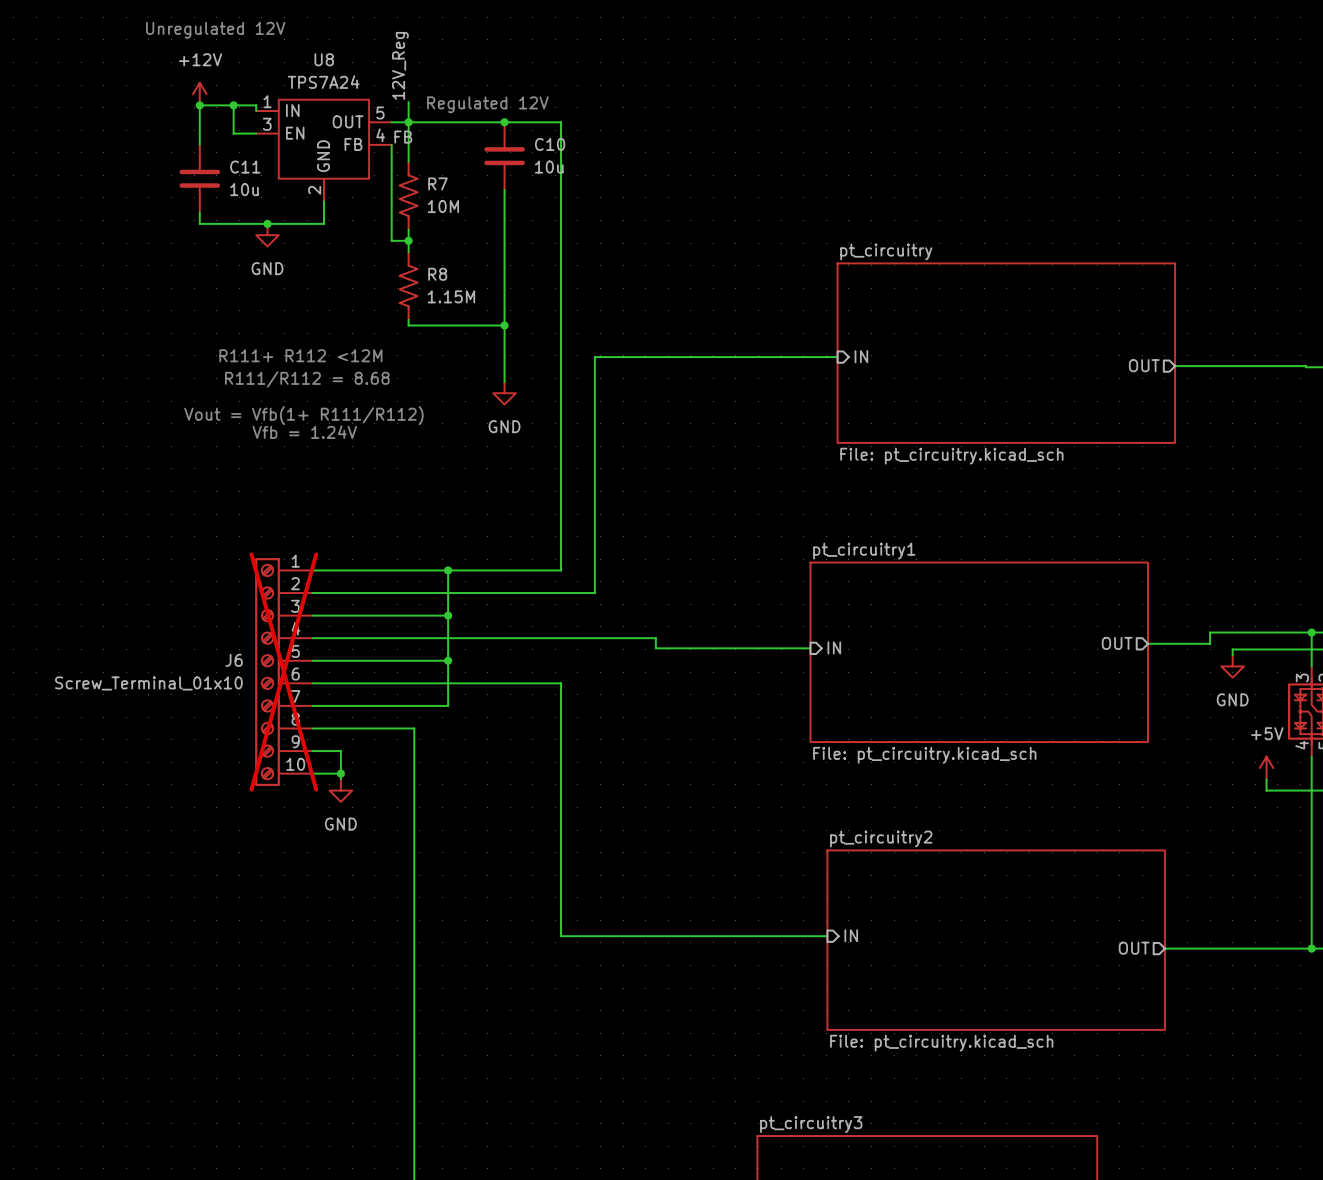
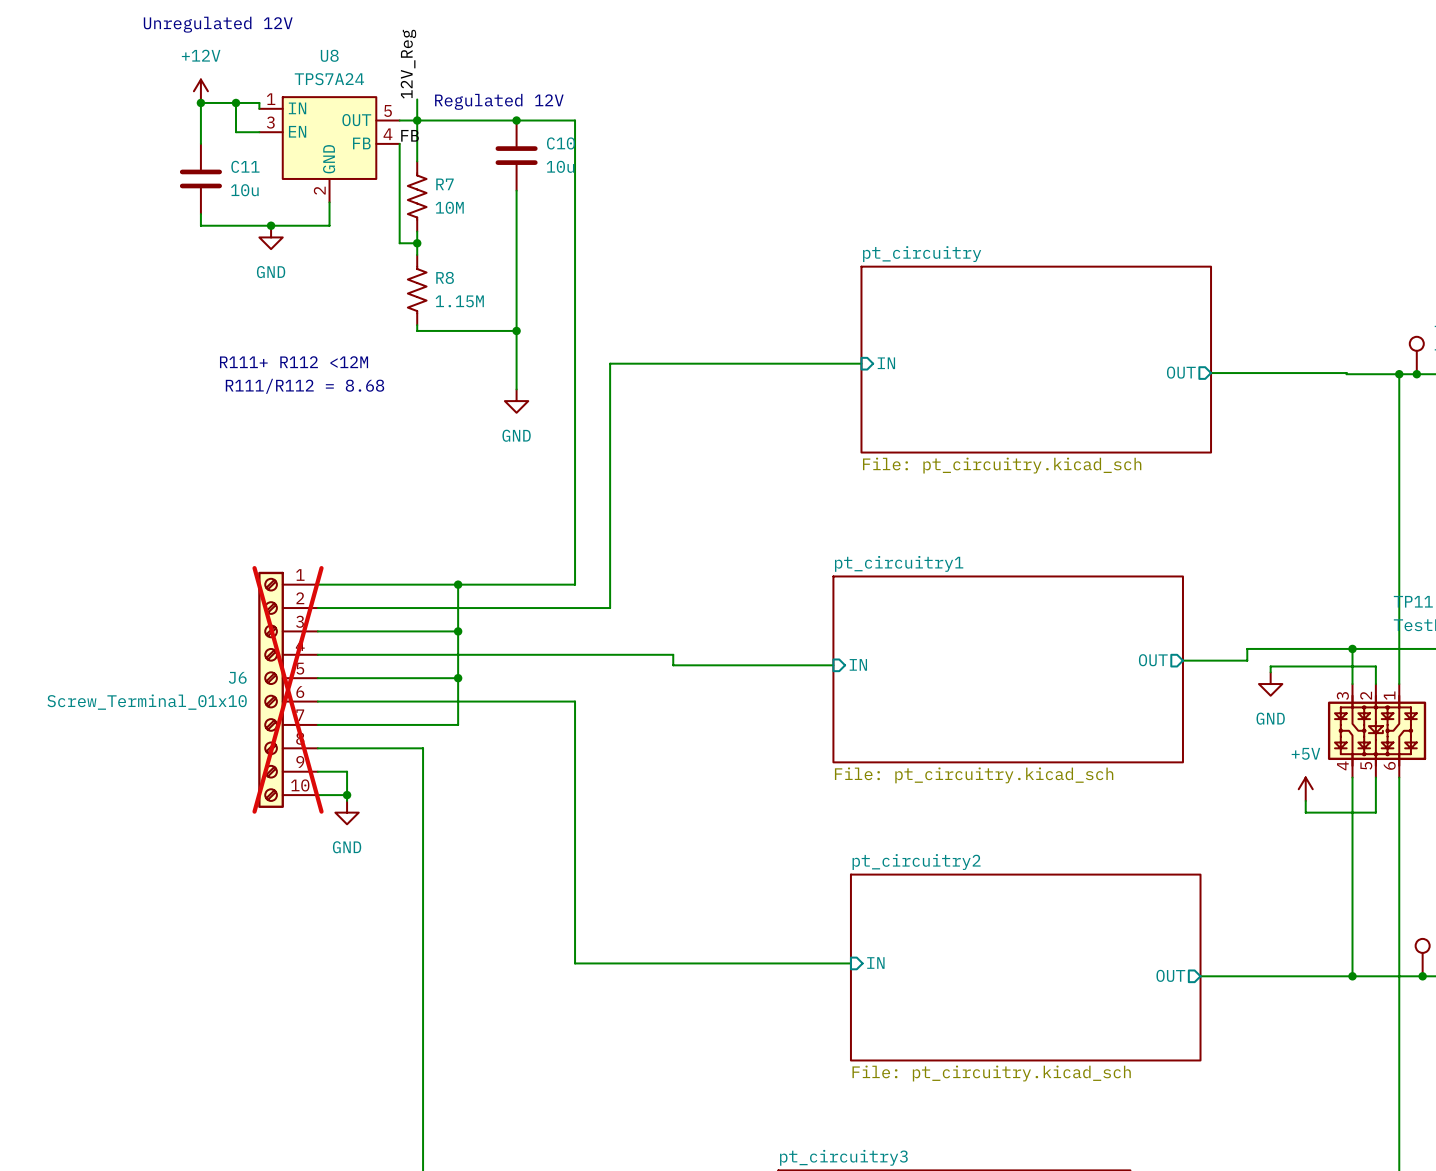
text: Vout = Vfb(1+ R111/R112) (303, 415) -> none
text: Vfb = 1.24V (304, 432) -> none

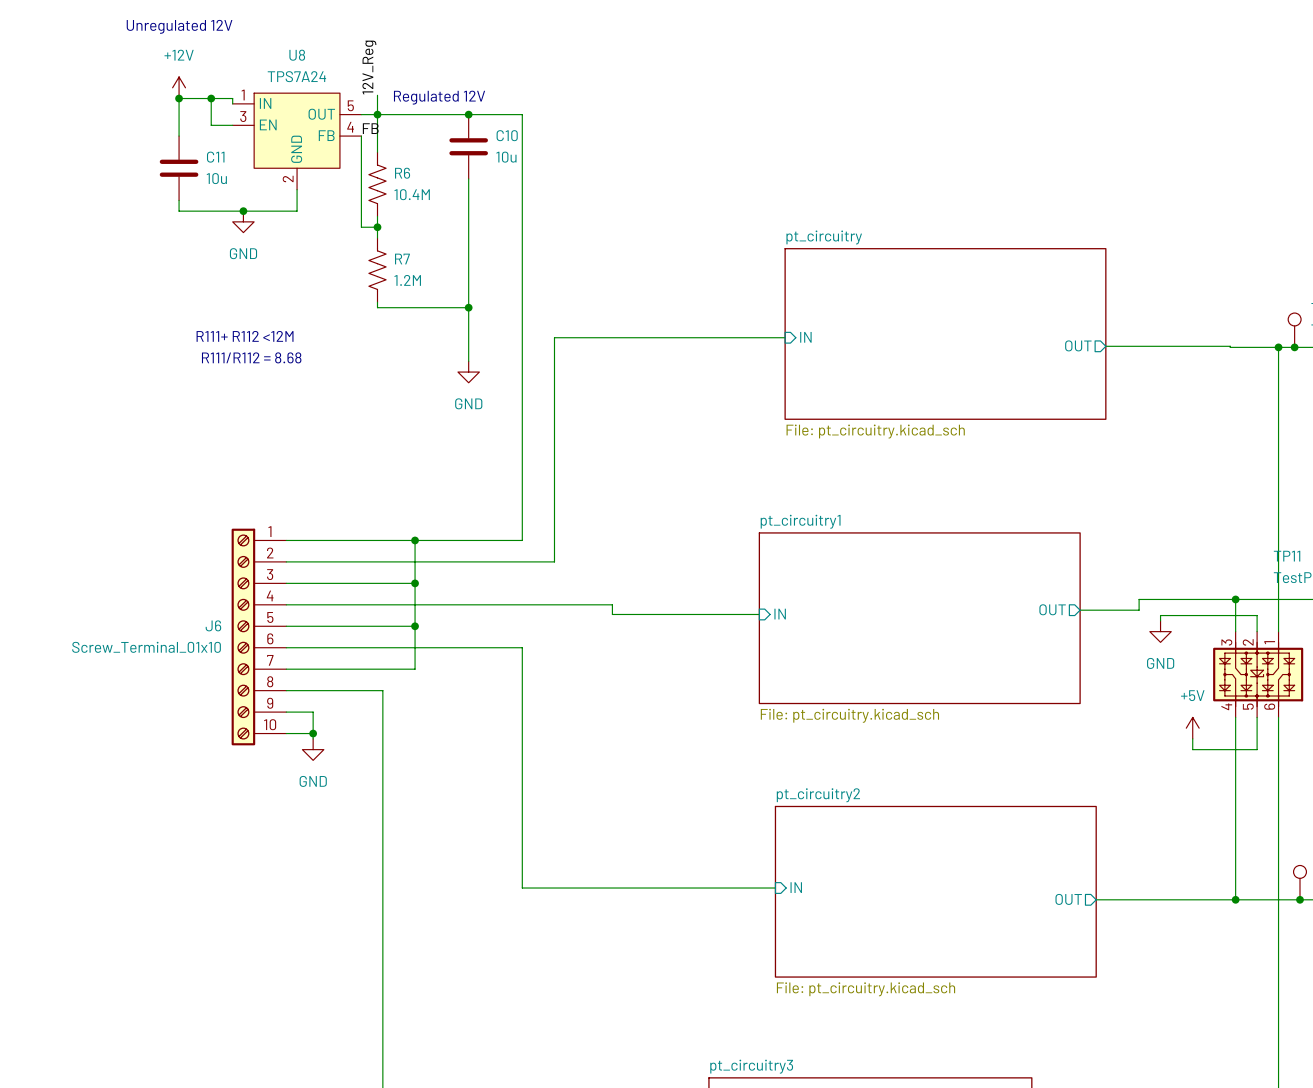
R7 name: R7 (444, 184) -> R6 (402, 173)
R7 value: 10M (449, 207) -> 10.4M (412, 194)
R8 name: R8 (445, 277) -> R7 (402, 259)
R8 value: 1.15M (459, 301) -> 1.2M (407, 280)
J6 do-not-place cross: (288, 689) -> none

